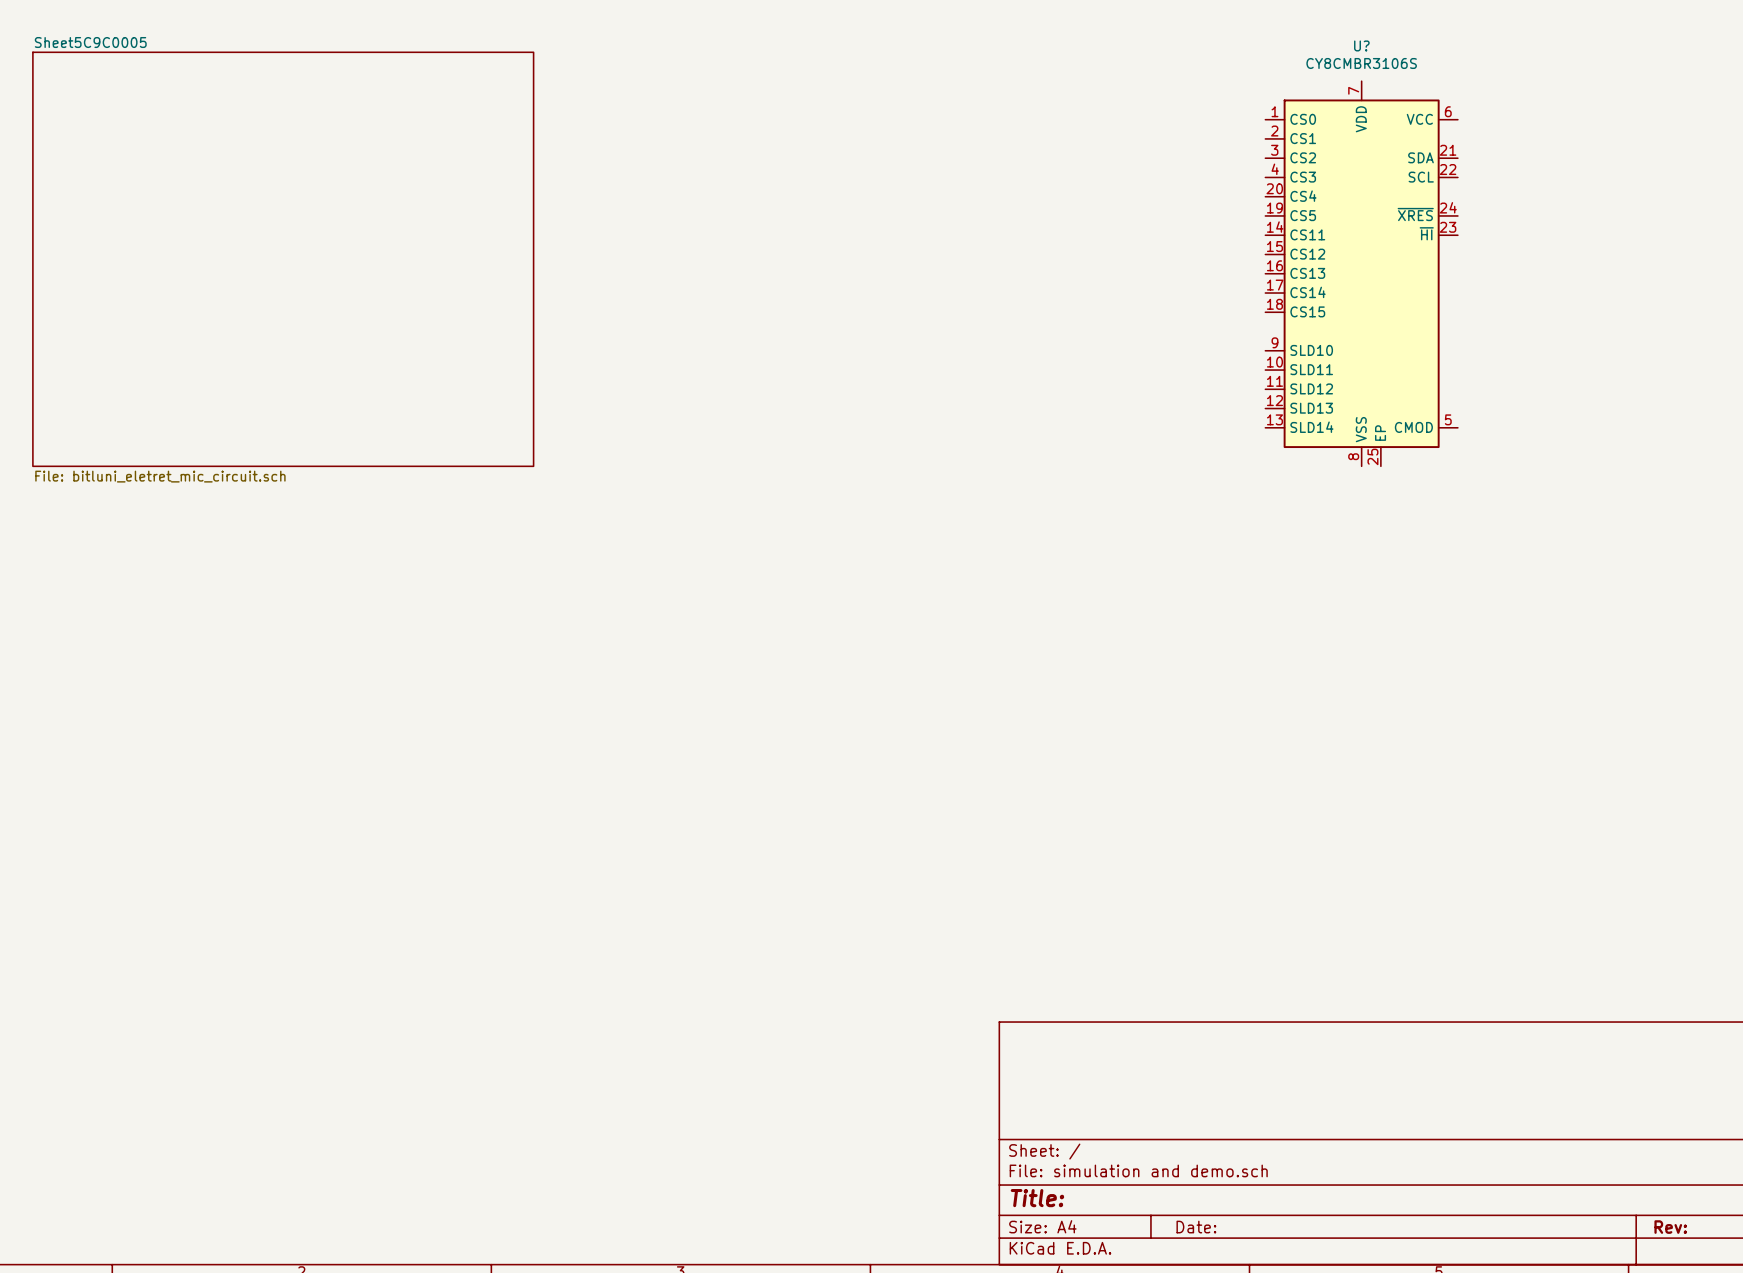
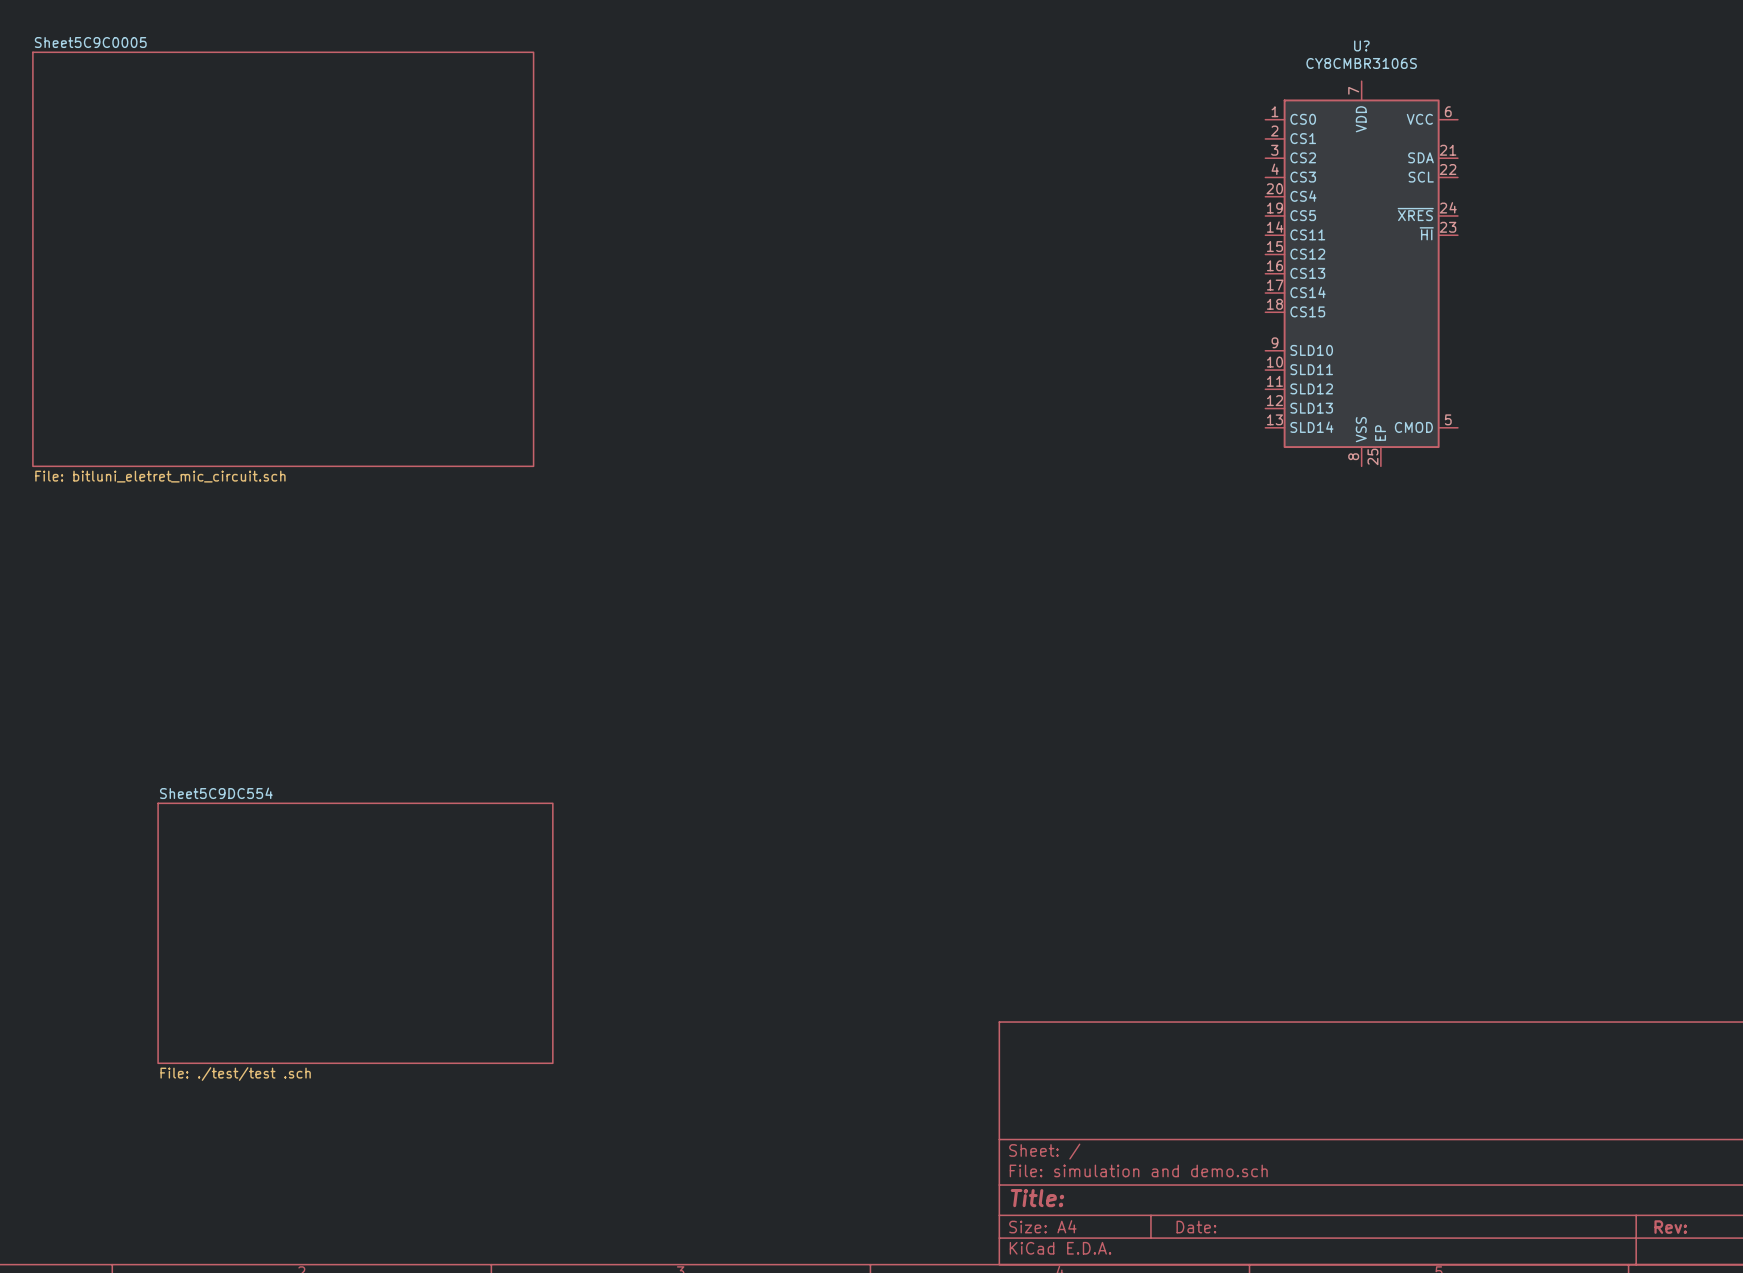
sheet Sheet5C9DC554: none -> File: ./test/test .sch (355, 933)

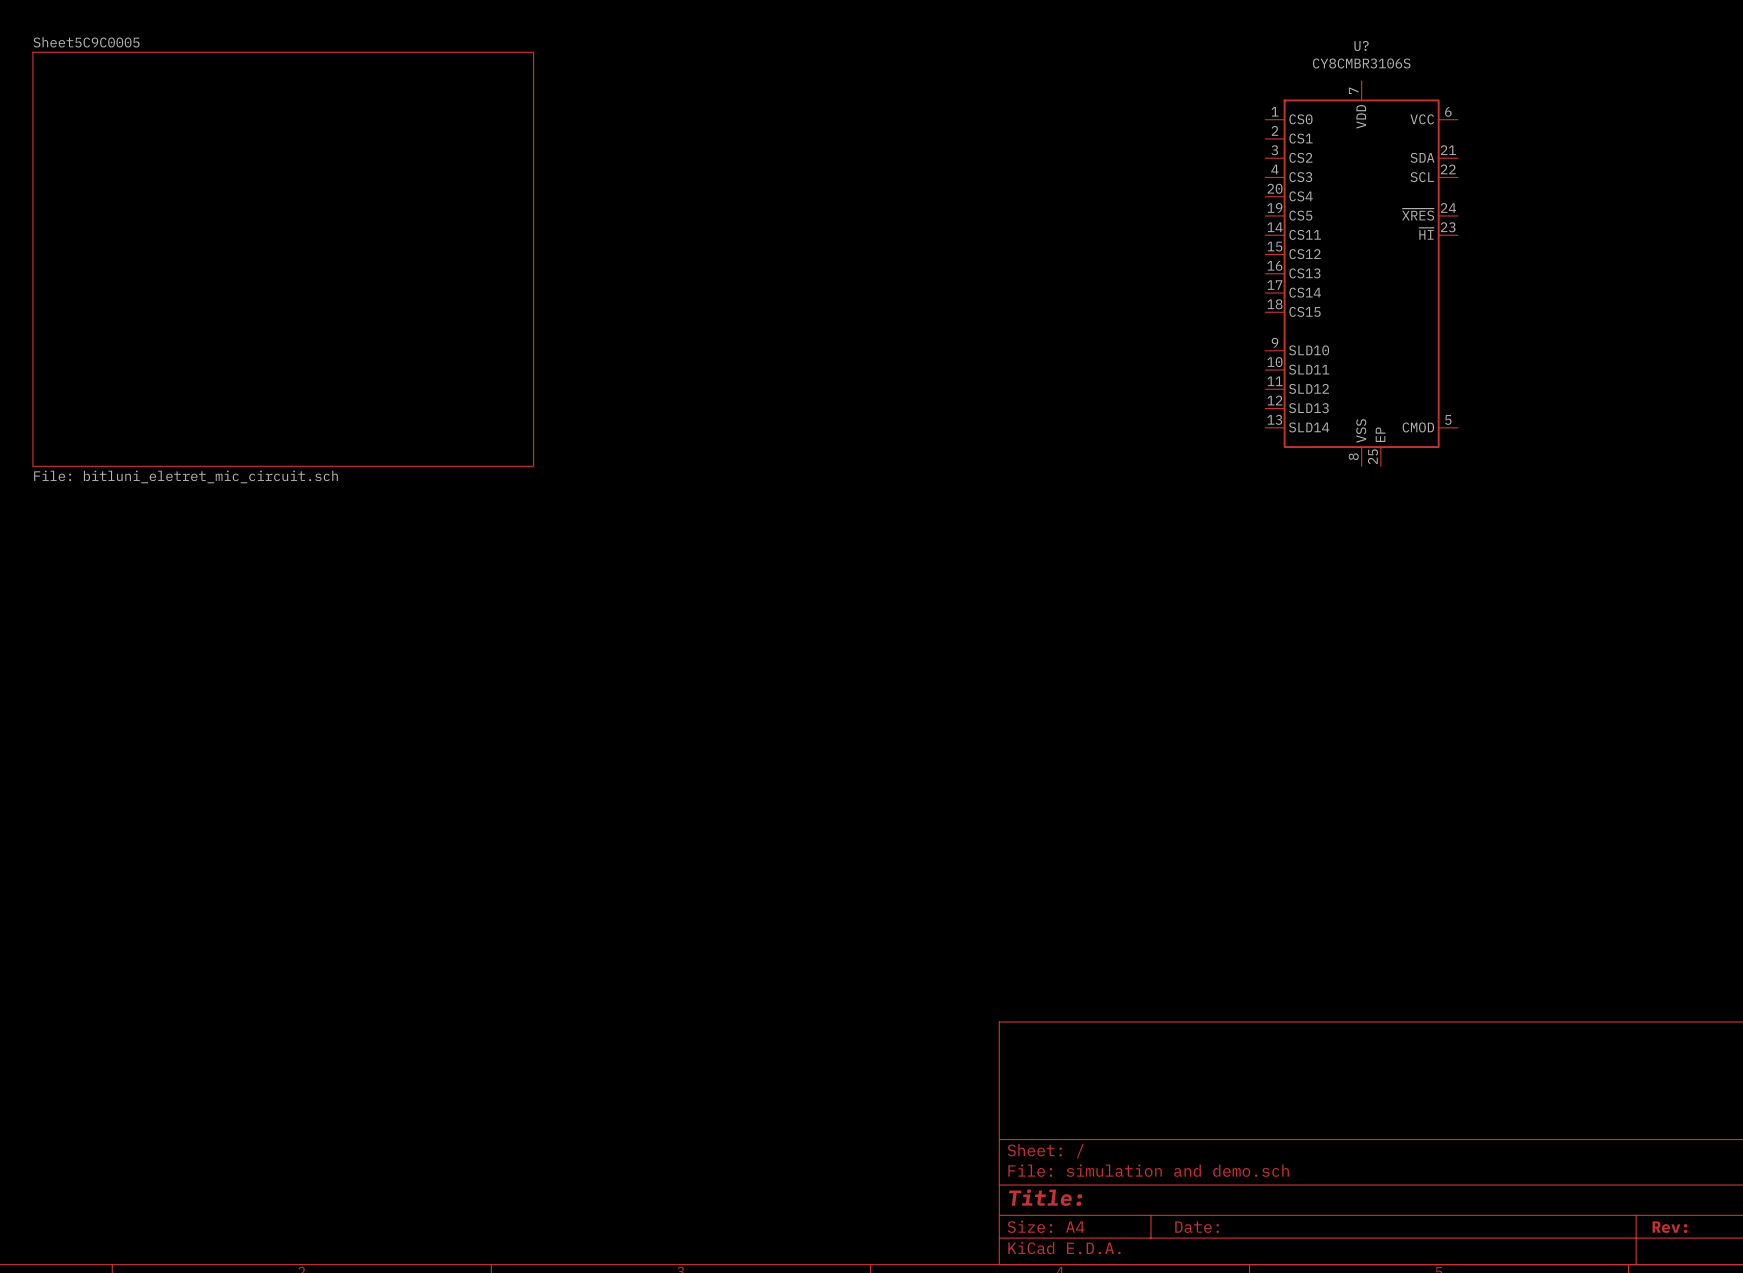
sheet Sheet5C9DC554: File: ./test/test .sch (355, 933) -> none

